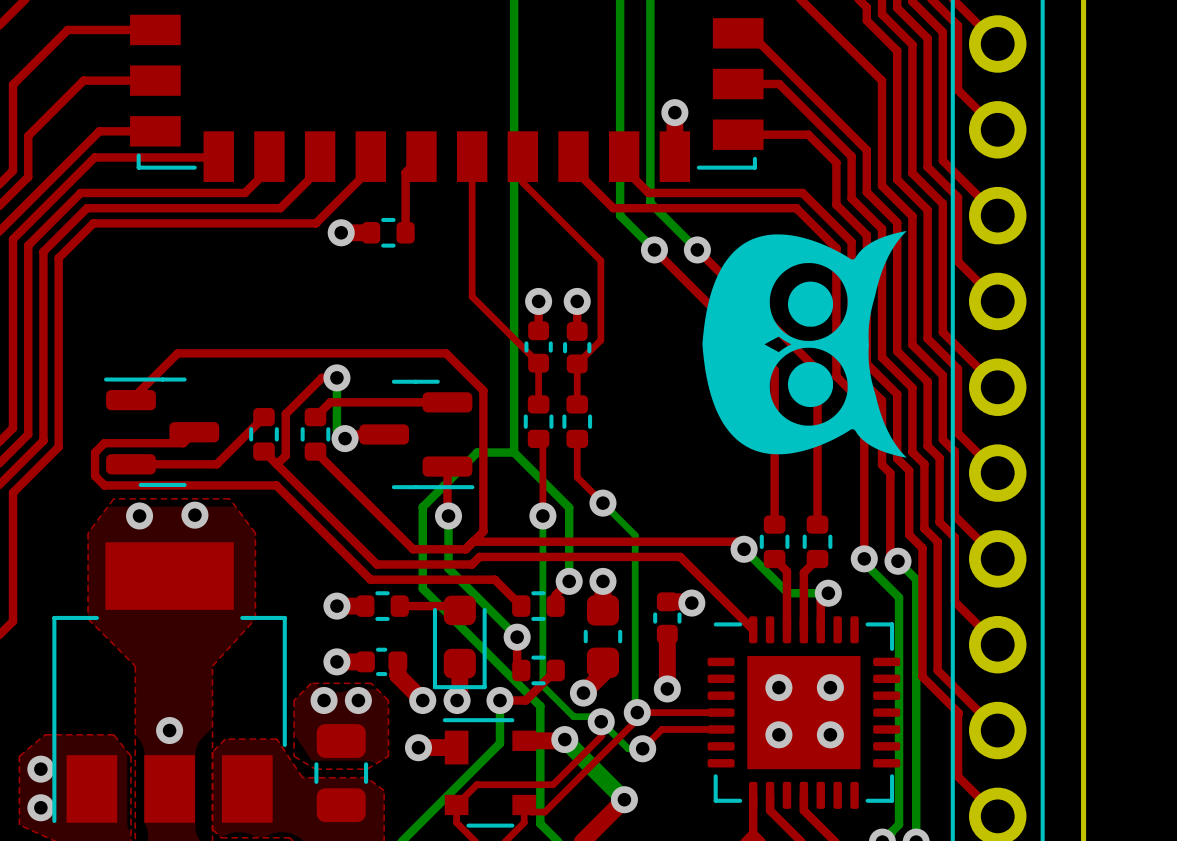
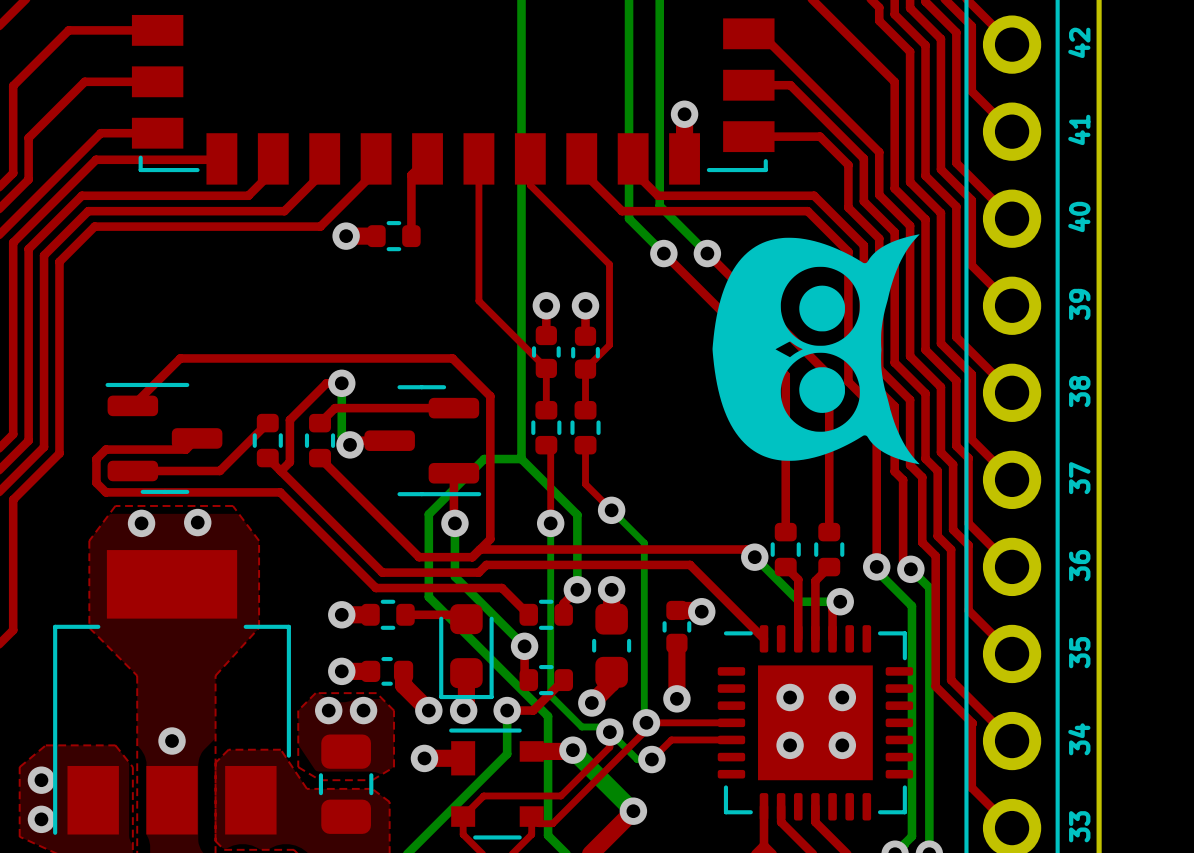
text: none -> 42 (1079, 42)
text: none -> 41 (1079, 129)
text: none -> 40 (1079, 216)
text: none -> 39 (1079, 304)
text: none -> 38 (1079, 391)
text: none -> 37 (1079, 478)
text: none -> 36 (1079, 565)
text: none -> 35 (1079, 652)
text: none -> 34 (1079, 739)
text: none -> 33 (1079, 826)

